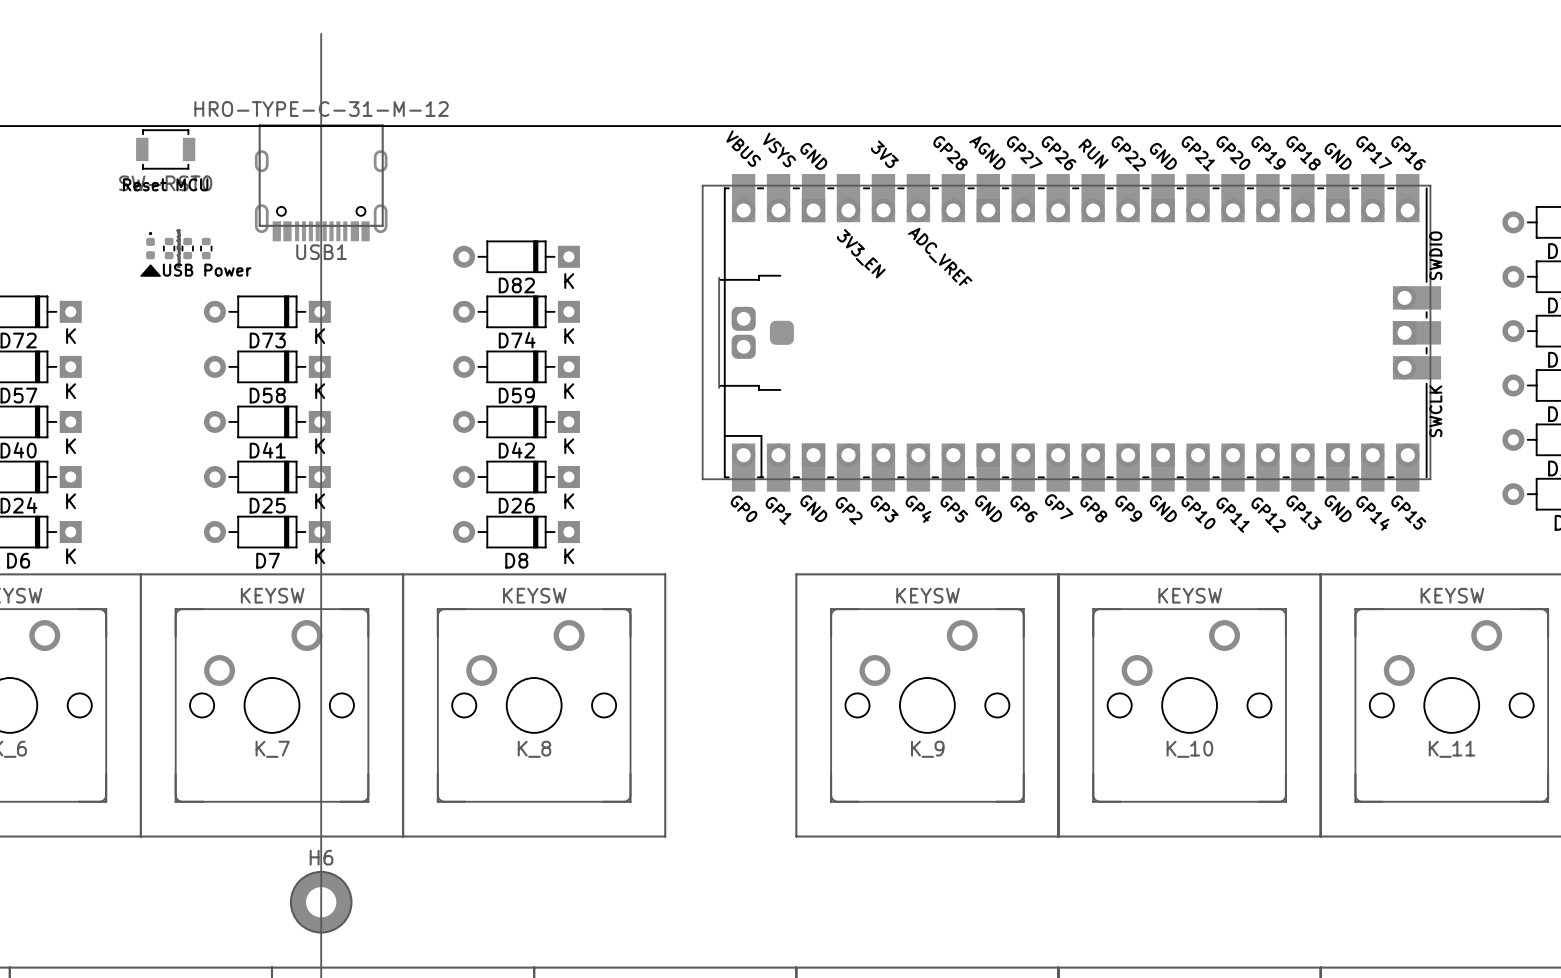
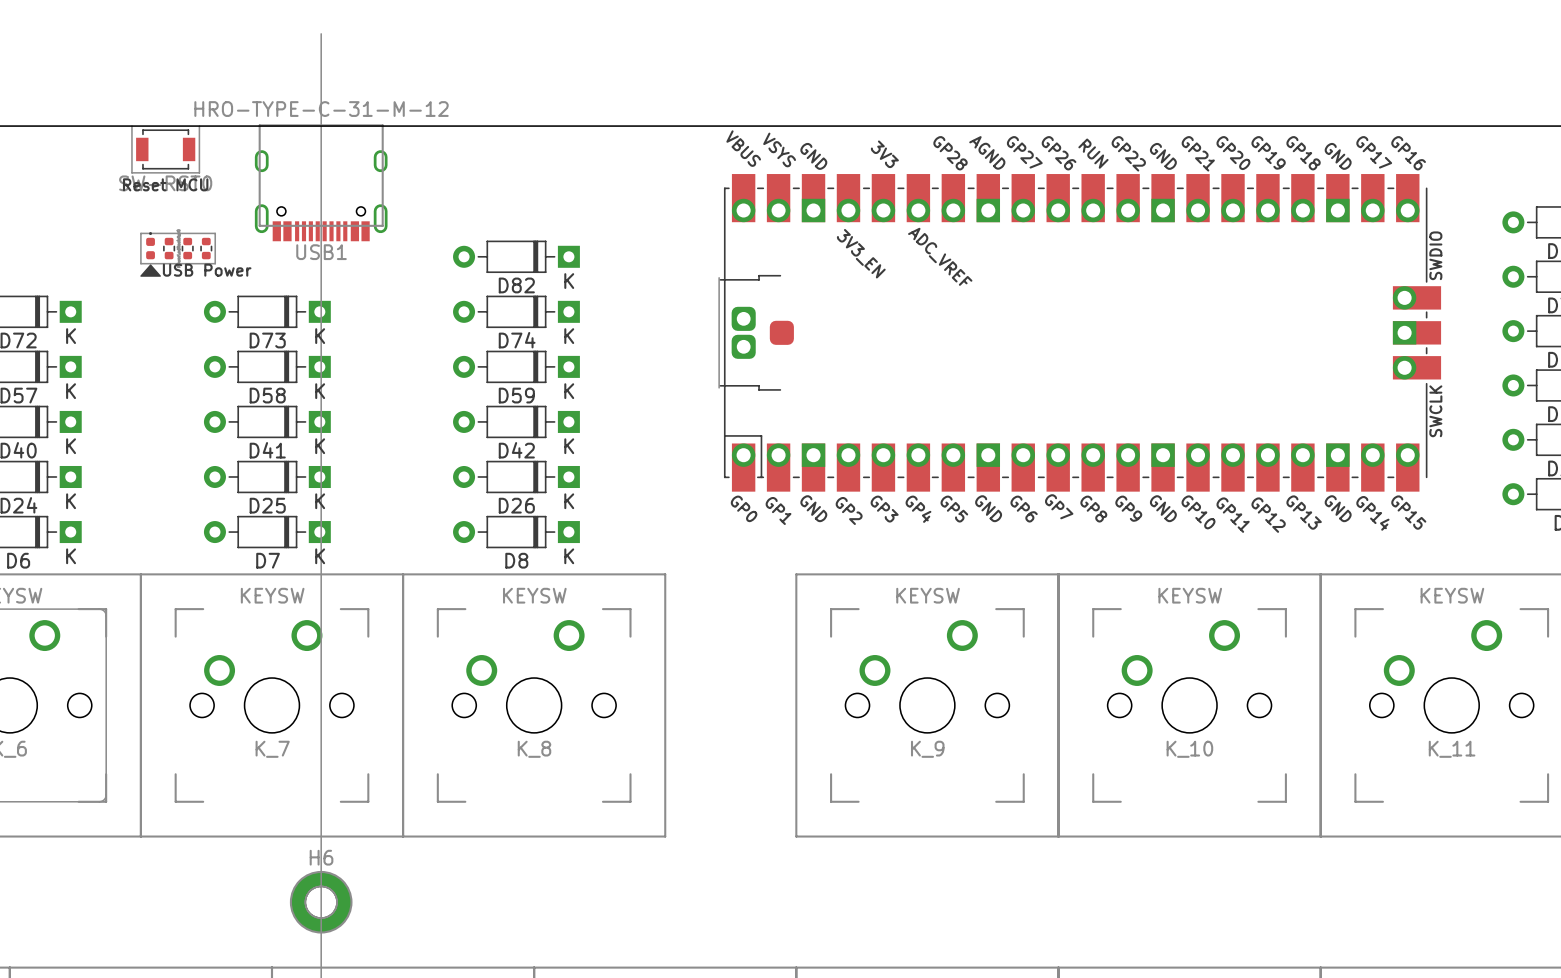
line: none -> (131, 126) (131, 172) (199, 172) (199, 126)
line: (702, 185) (702, 479) (1430, 479) (1430, 185) (702, 185) -> none
line: none -> (140, 233) (140, 263) (215, 263) (215, 233) (140, 233)
line: (182, 609) (361, 609) (366, 611) (368, 615) (368, 794) (366, 799) (361, 801) (182, 801) (177, 799) (175, 794) (175, 615) (177, 611) (182, 609) -> none
line: (444, 609) (623, 609) (628, 611) (630, 615) (630, 794) (628, 799) (623, 801) (444, 801) (439, 799) (437, 794) (437, 615) (439, 611) (444, 609) -> none
line: (837, 609) (1016, 609) (1021, 611) (1023, 615) (1023, 794) (1021, 799) (1016, 801) (837, 801) (833, 799) (831, 794) (831, 615) (833, 611) (837, 609) -> none
line: (1100, 609) (1279, 609) (1283, 611) (1285, 615) (1285, 794) (1283, 799) (1279, 801) (1100, 801) (1095, 799) (1093, 794) (1093, 615) (1095, 611) (1100, 609) -> none
line: (1362, 609) (1541, 609) (1546, 611) (1548, 615) (1548, 794) (1546, 799) (1541, 801) (1362, 801) (1357, 799) (1355, 794) (1355, 615) (1357, 611) (1362, 609) -> none
drawing: none -> [304, 885, 338, 919]

